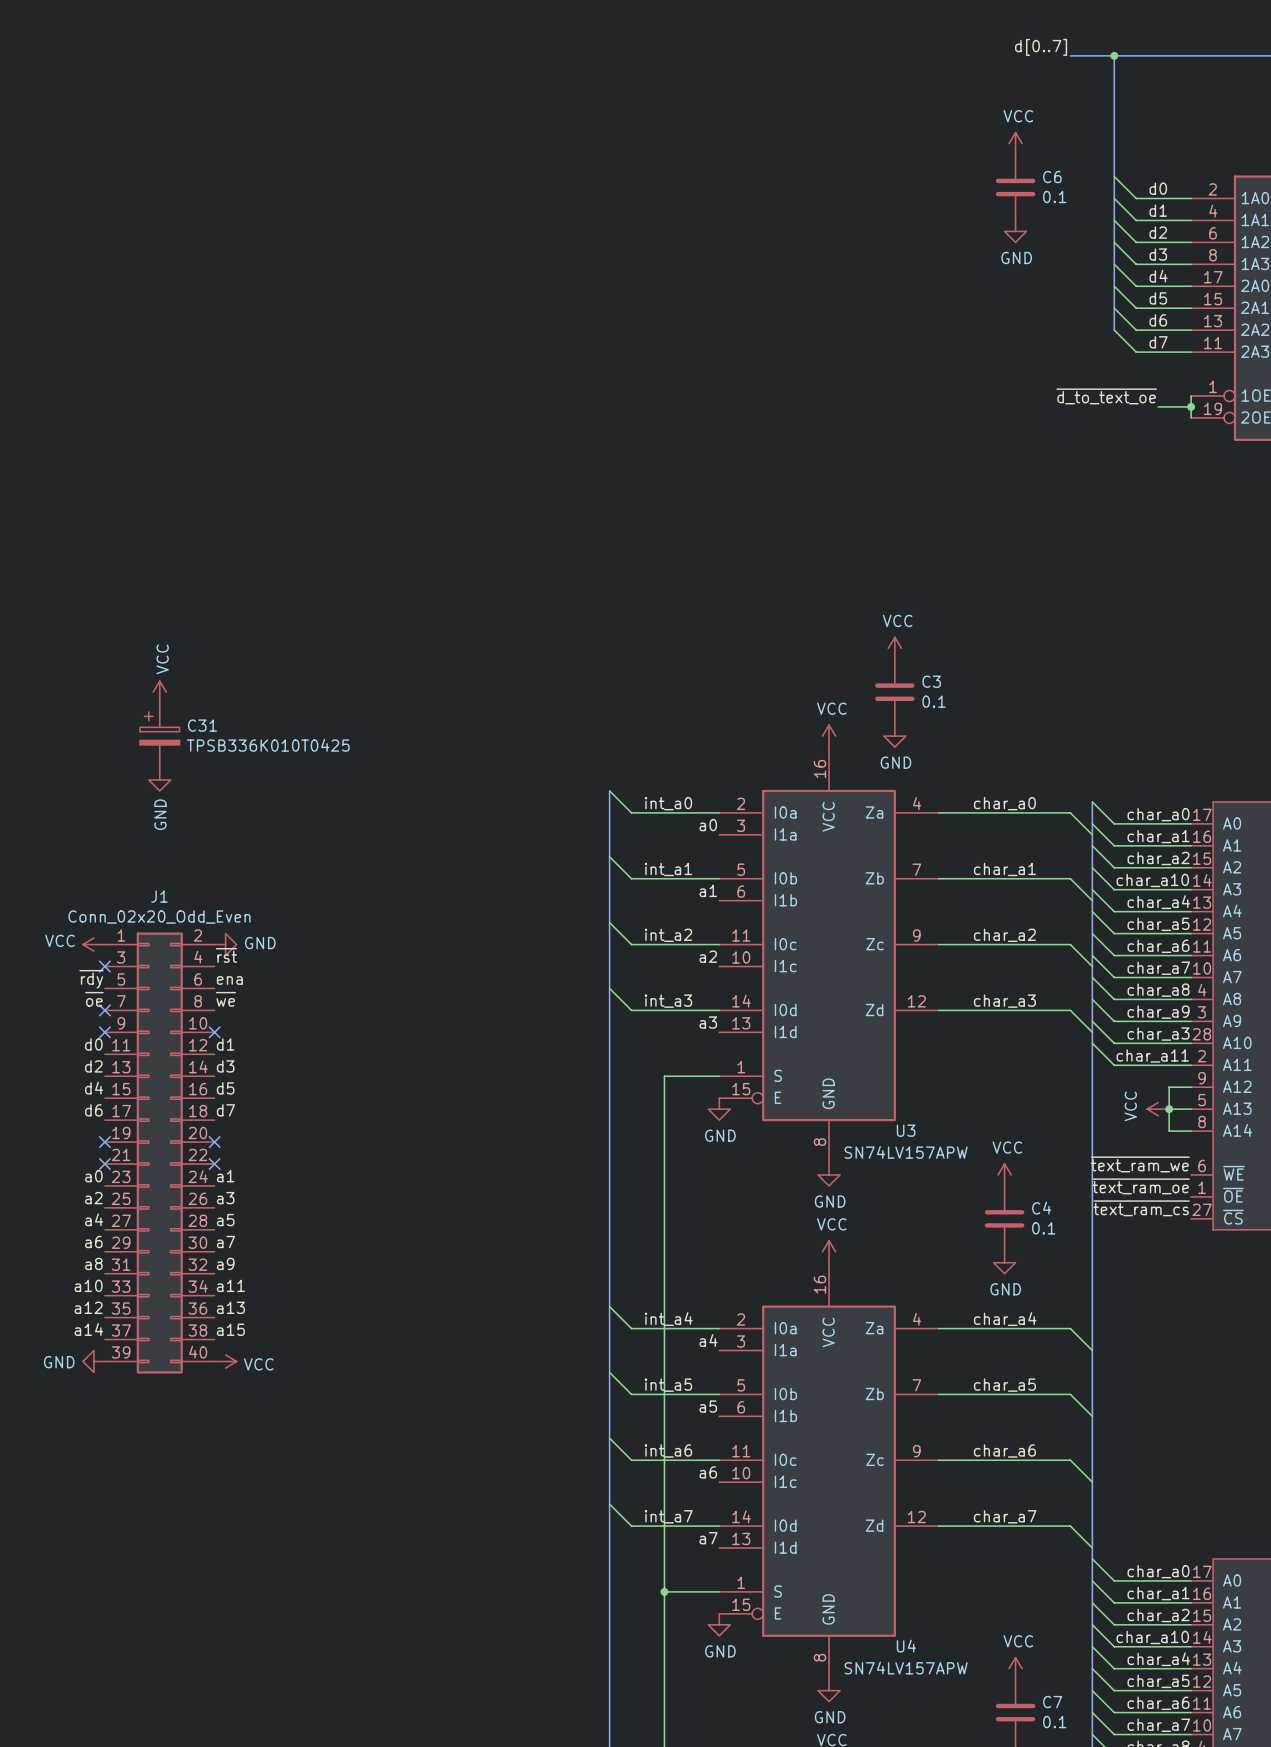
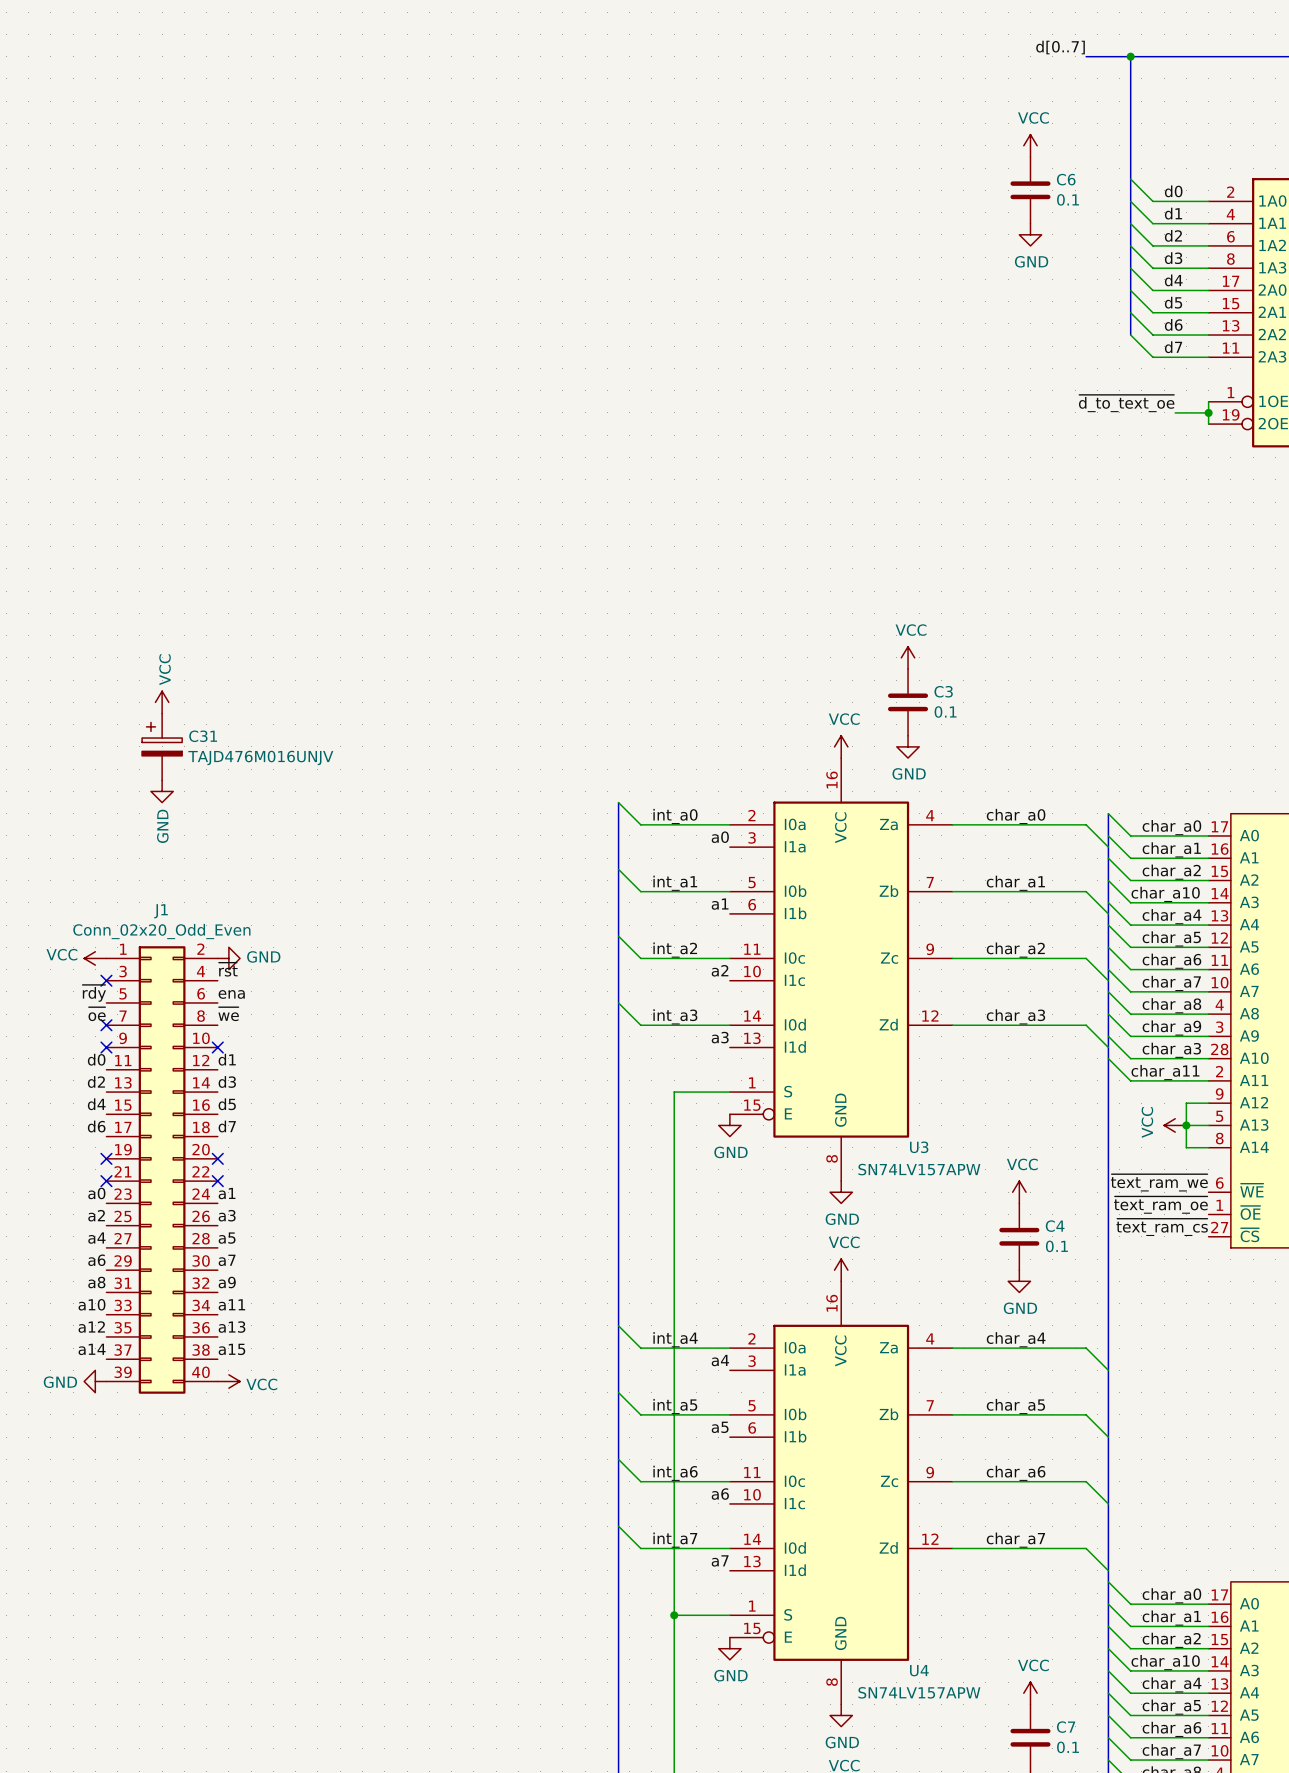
C31 value: TPSB336K010T0425 (268, 745) -> TAJD476M016UNJV (260, 757)

